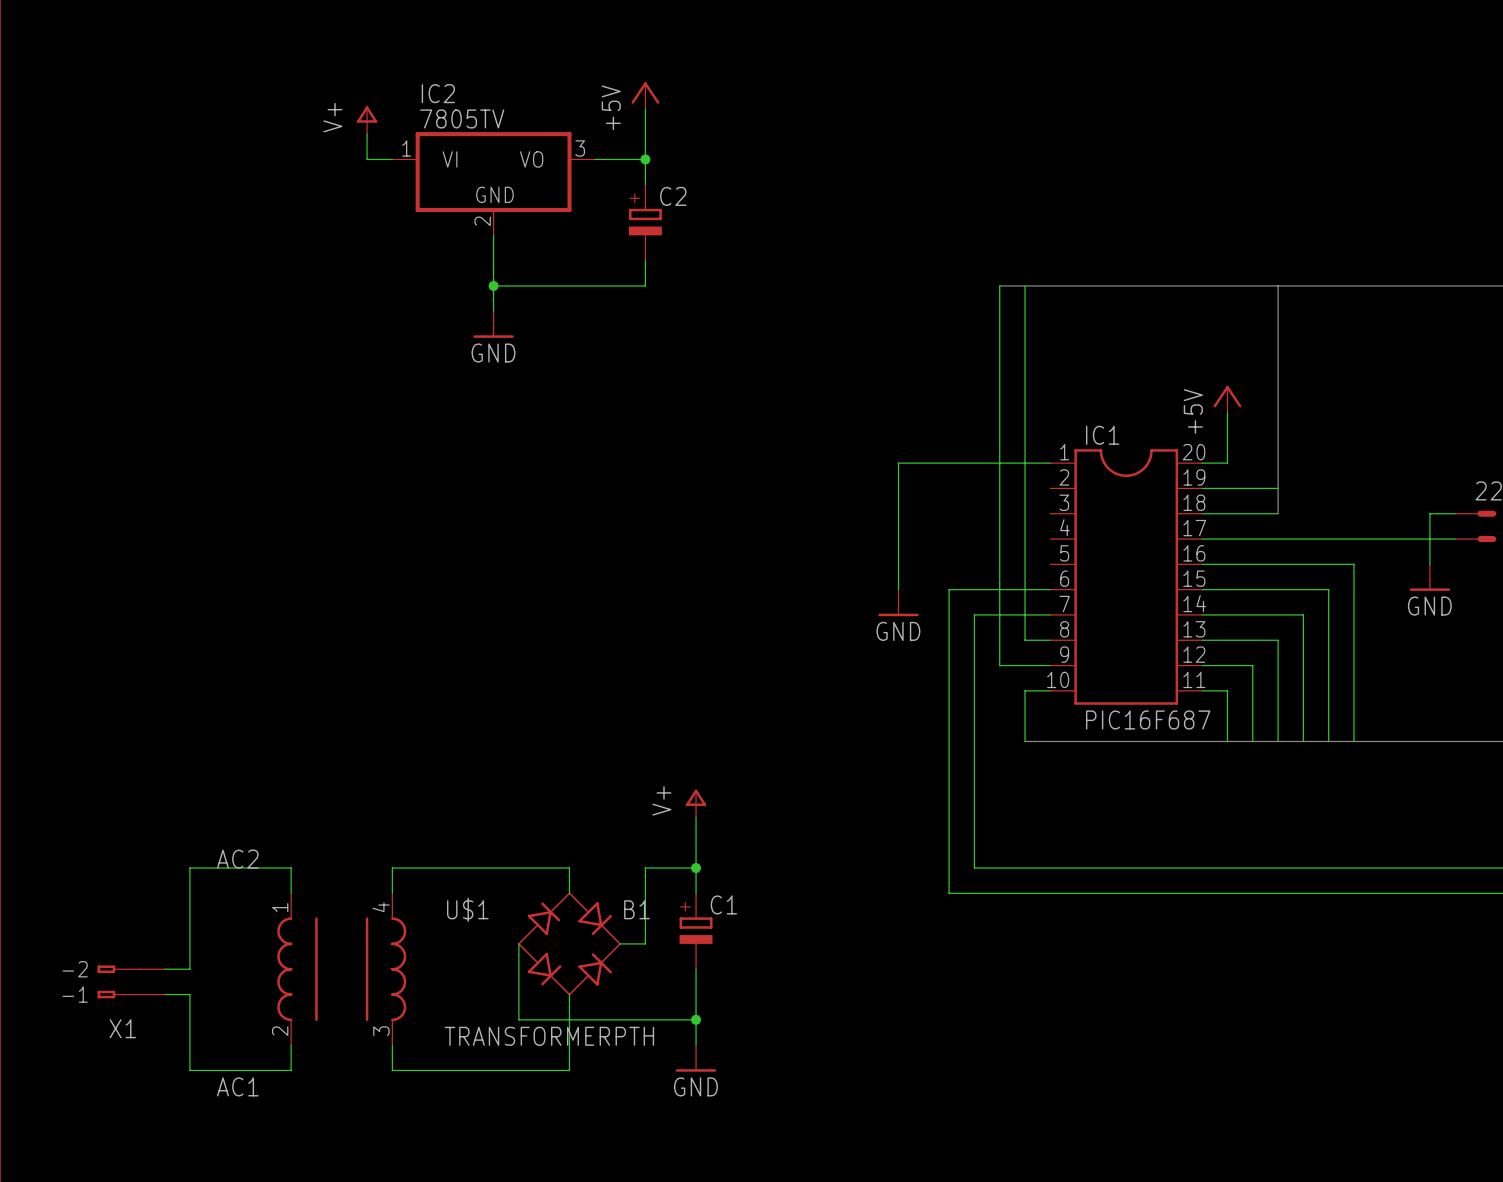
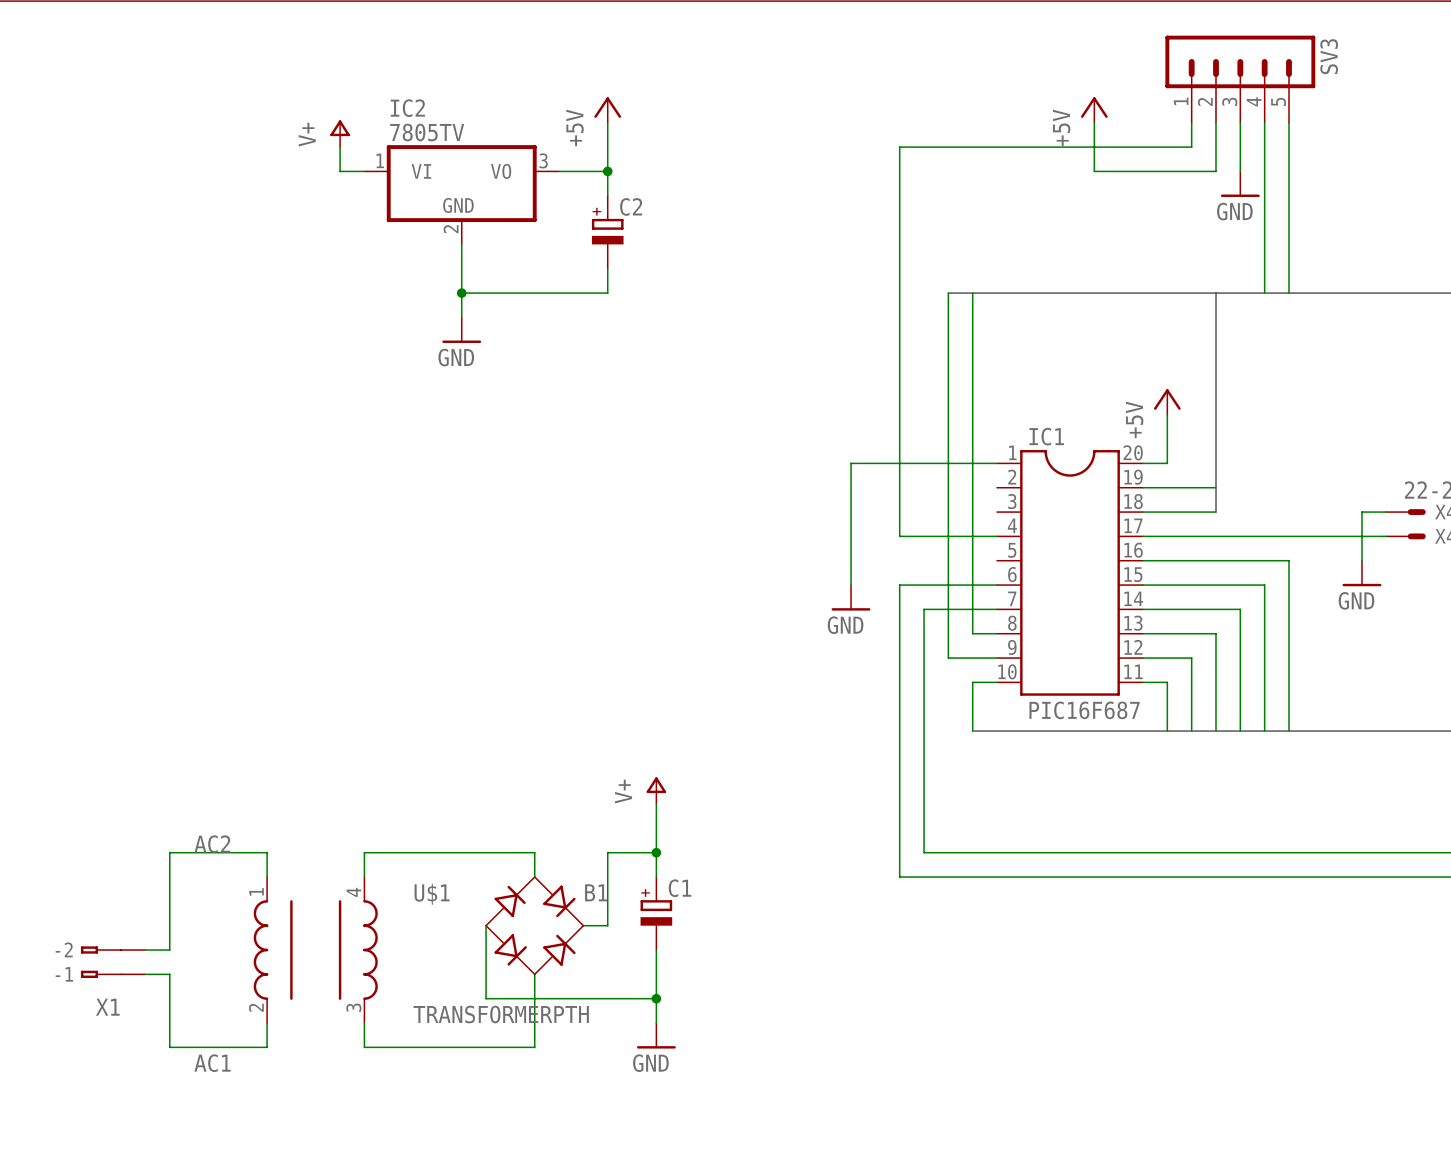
SV3: none -> (1240, 79)
power symbol: none -> +5V (1094, 109)
wire: none -> (1094, 122) (1094, 171) (1216, 171) (1216, 122)
wire: none -> (1191, 122) (1191, 147) (899, 147) (899, 536) (997, 536)
wire: none -> (1240, 122) (1240, 171)
wire: none -> (1264, 122) (1264, 293)
wire: none -> (1288, 122) (1288, 293)
power symbol: none -> GND (1240, 184)

